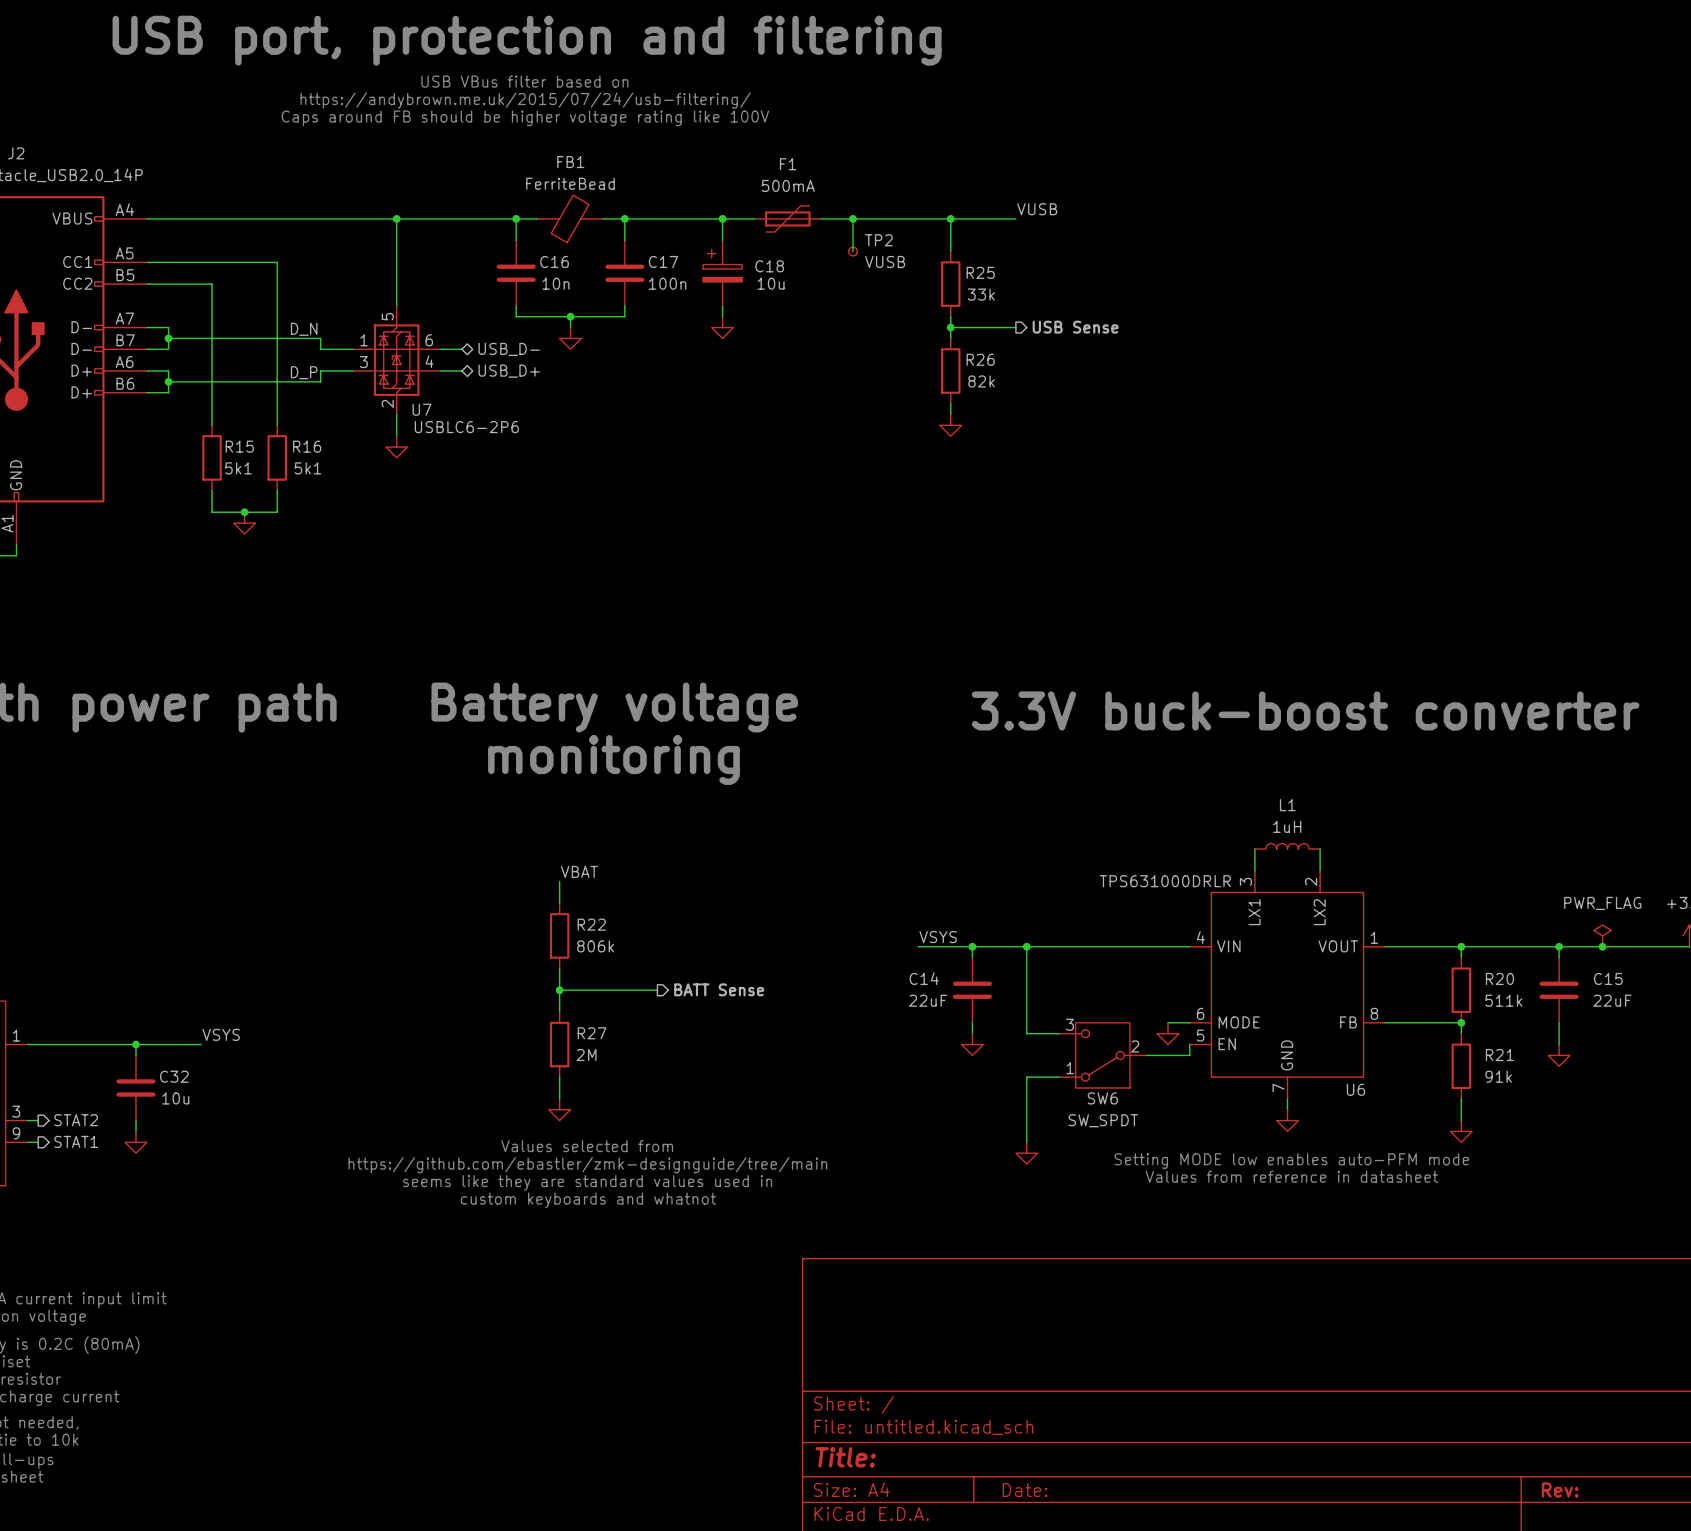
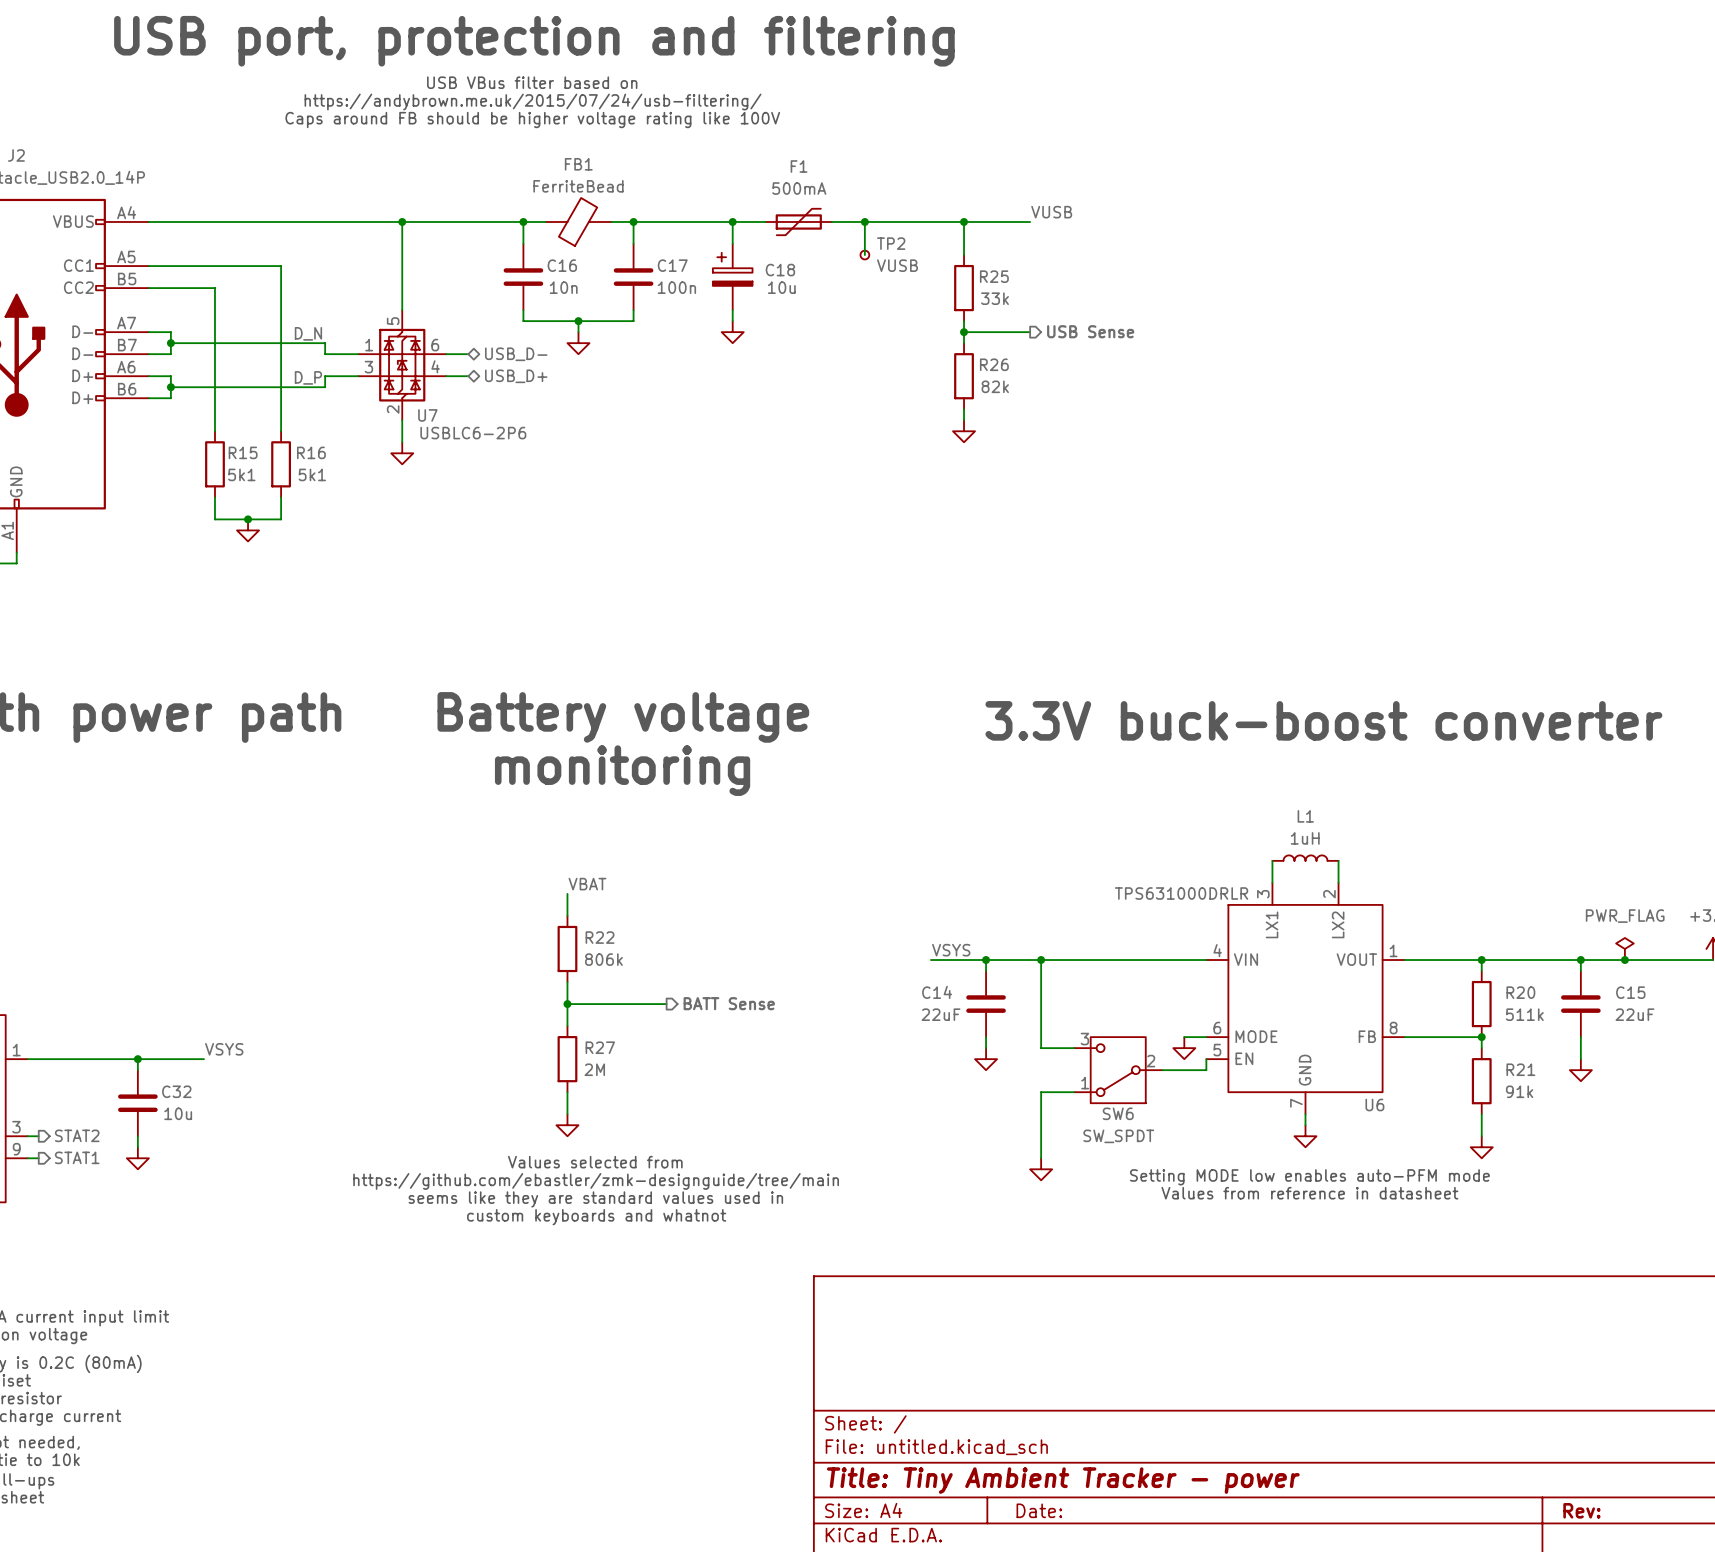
title block: Title: (845, 1457) -> Title: Tiny Ambient Tracker - power (1063, 1480)

